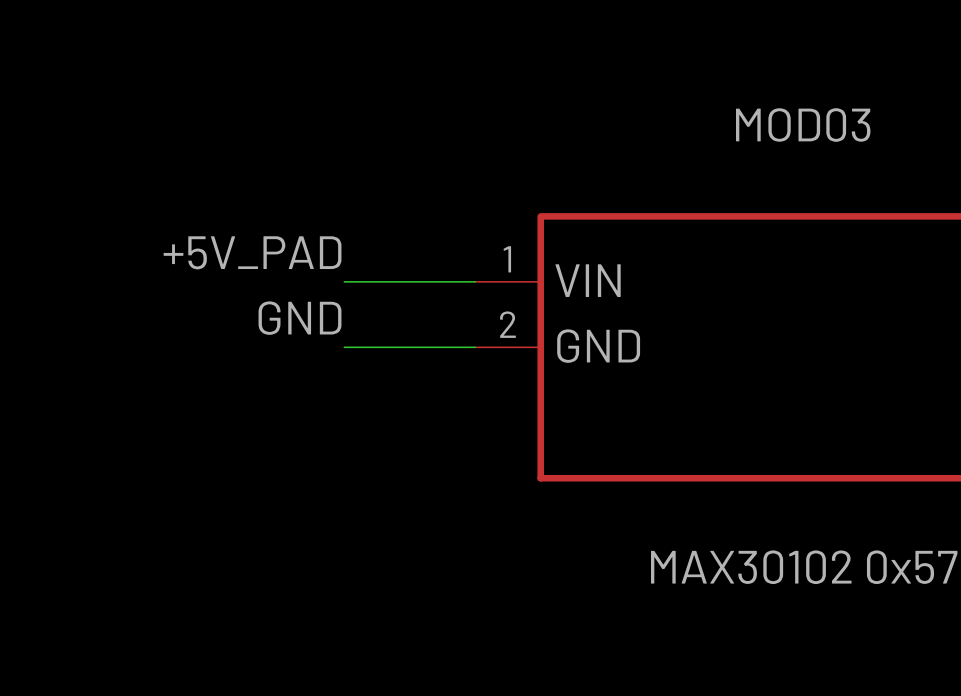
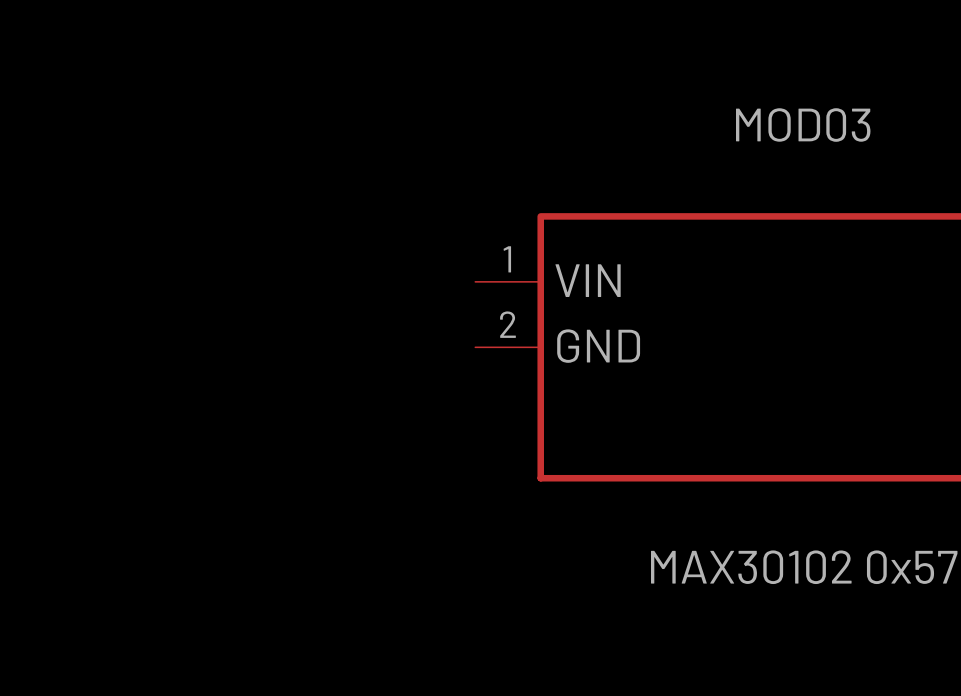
label: +5V_PAD (252, 252) -> none
wire: (344, 281) (475, 281) -> none
label: GND (300, 318) -> none
wire: (344, 347) (475, 347) -> none

